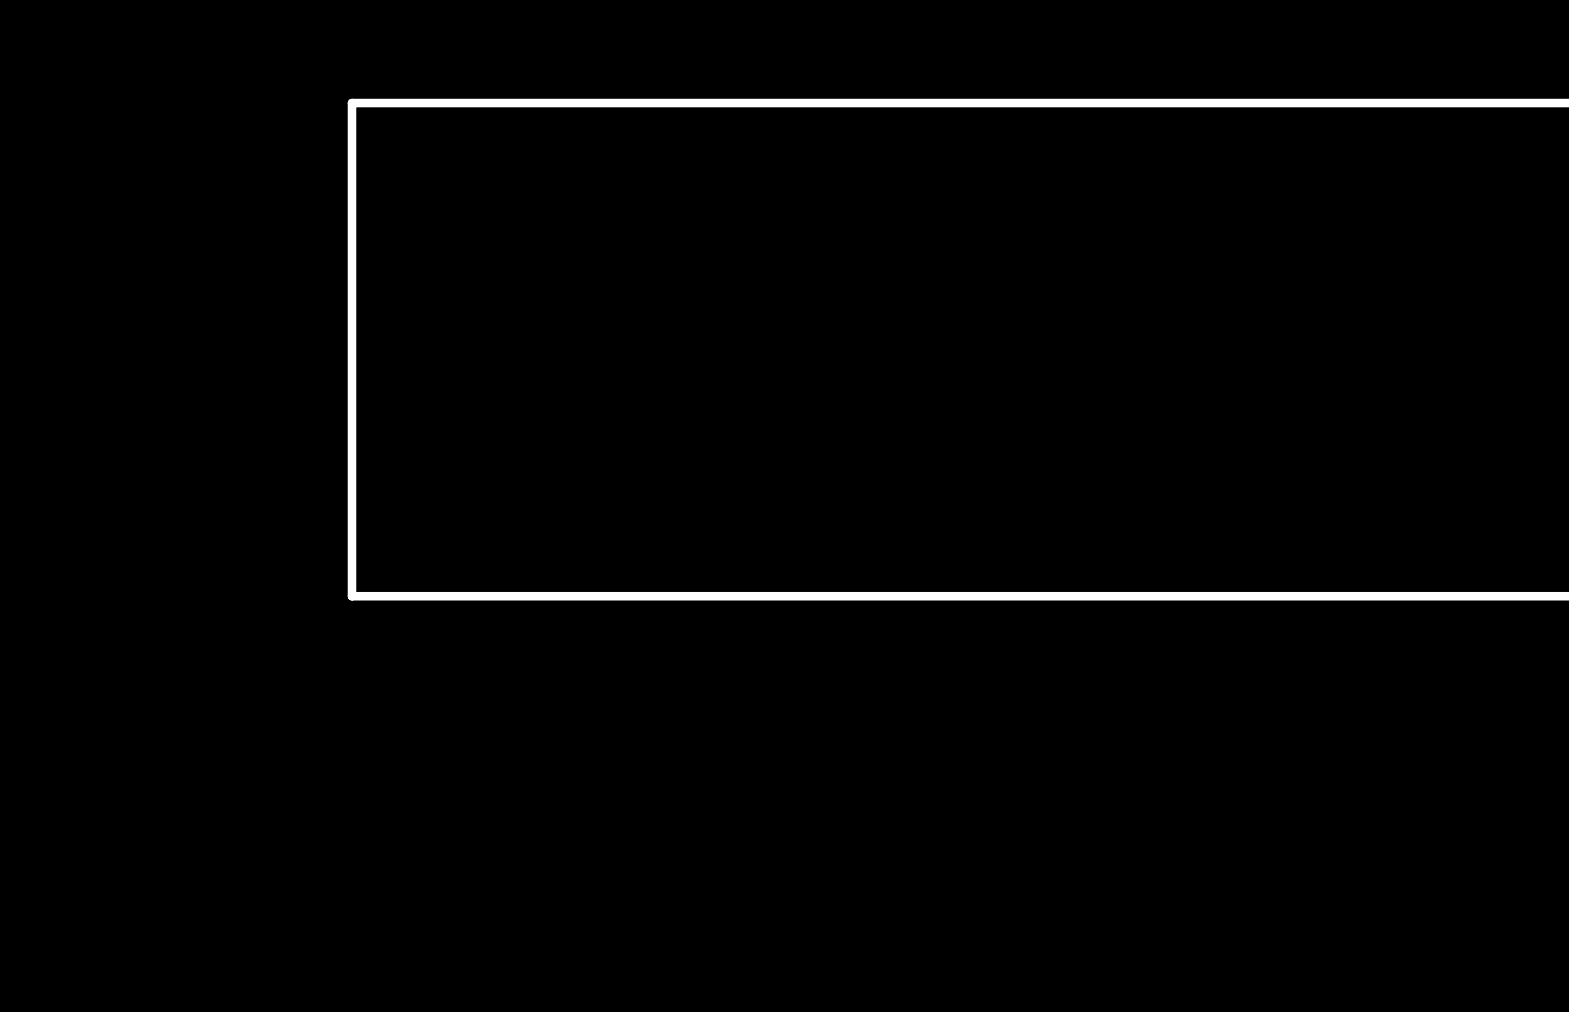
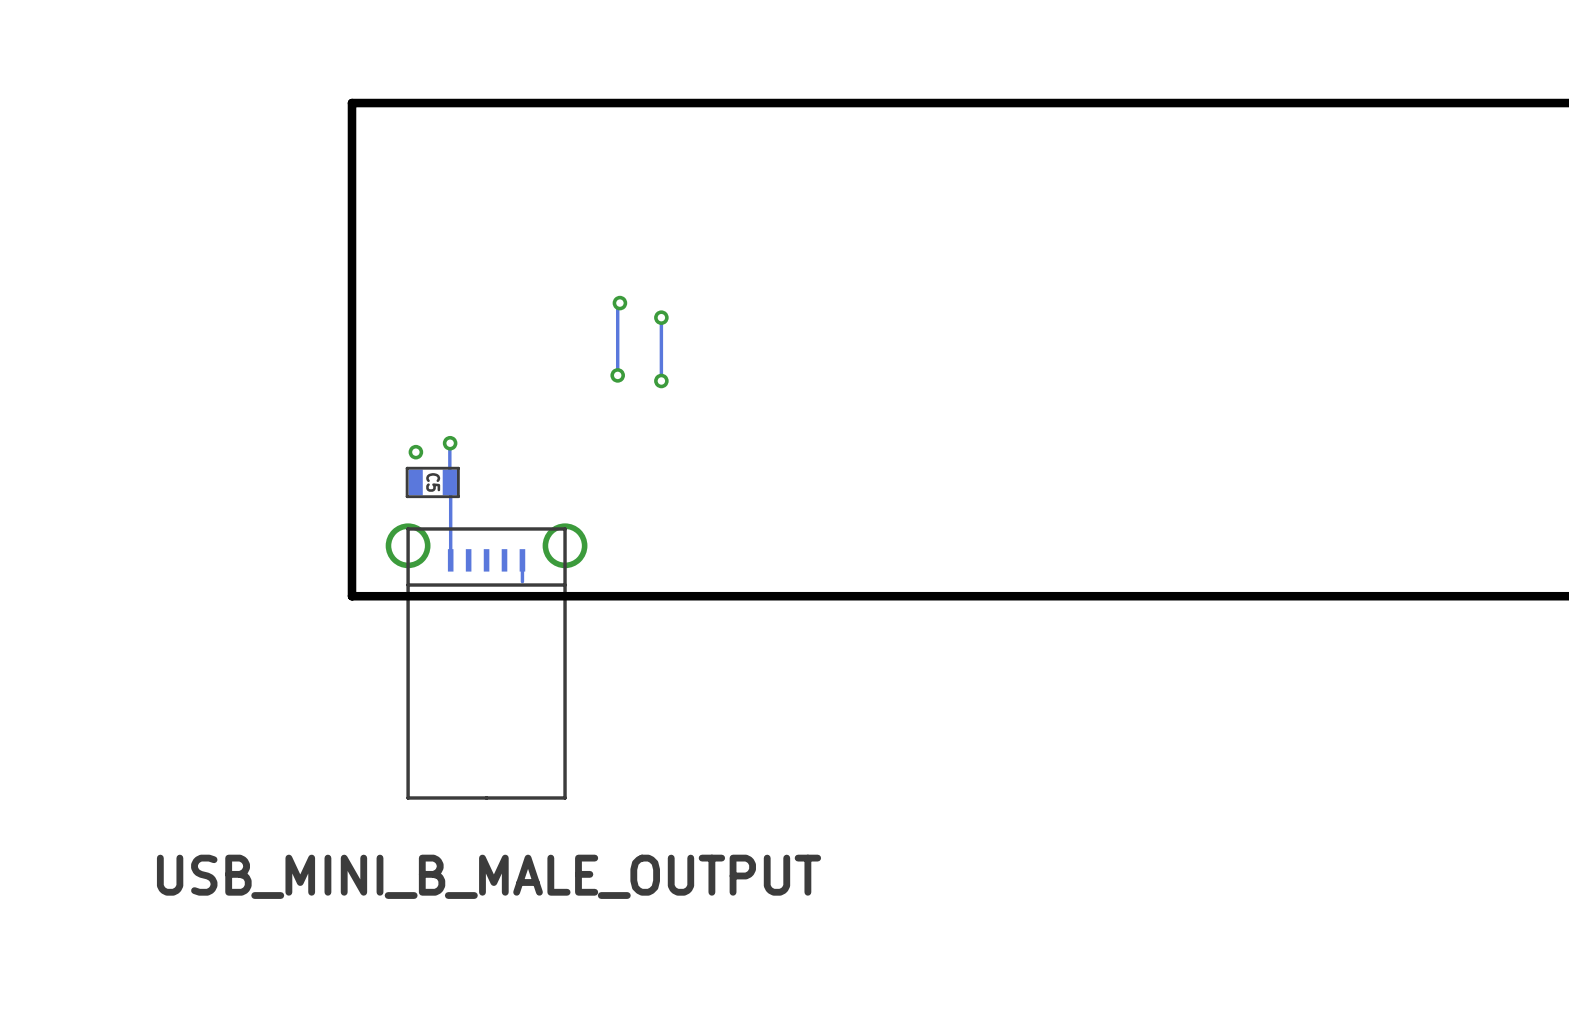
track: none -> (619, 303) (617, 305) (617, 375)
via: none -> (619, 303)
track: none -> (661, 317) (661, 380)
via: none -> (661, 317)
via: none -> (617, 375)
via: none -> (661, 380)
track: none -> (449, 443) (450, 560)
via: none -> (450, 443)
via: none -> (415, 452)
C5: none -> (432, 482)
track: none -> (522, 560) (522, 581)
part: none -> USB_MINI_B_MALE_OUTPUT (486, 661)

